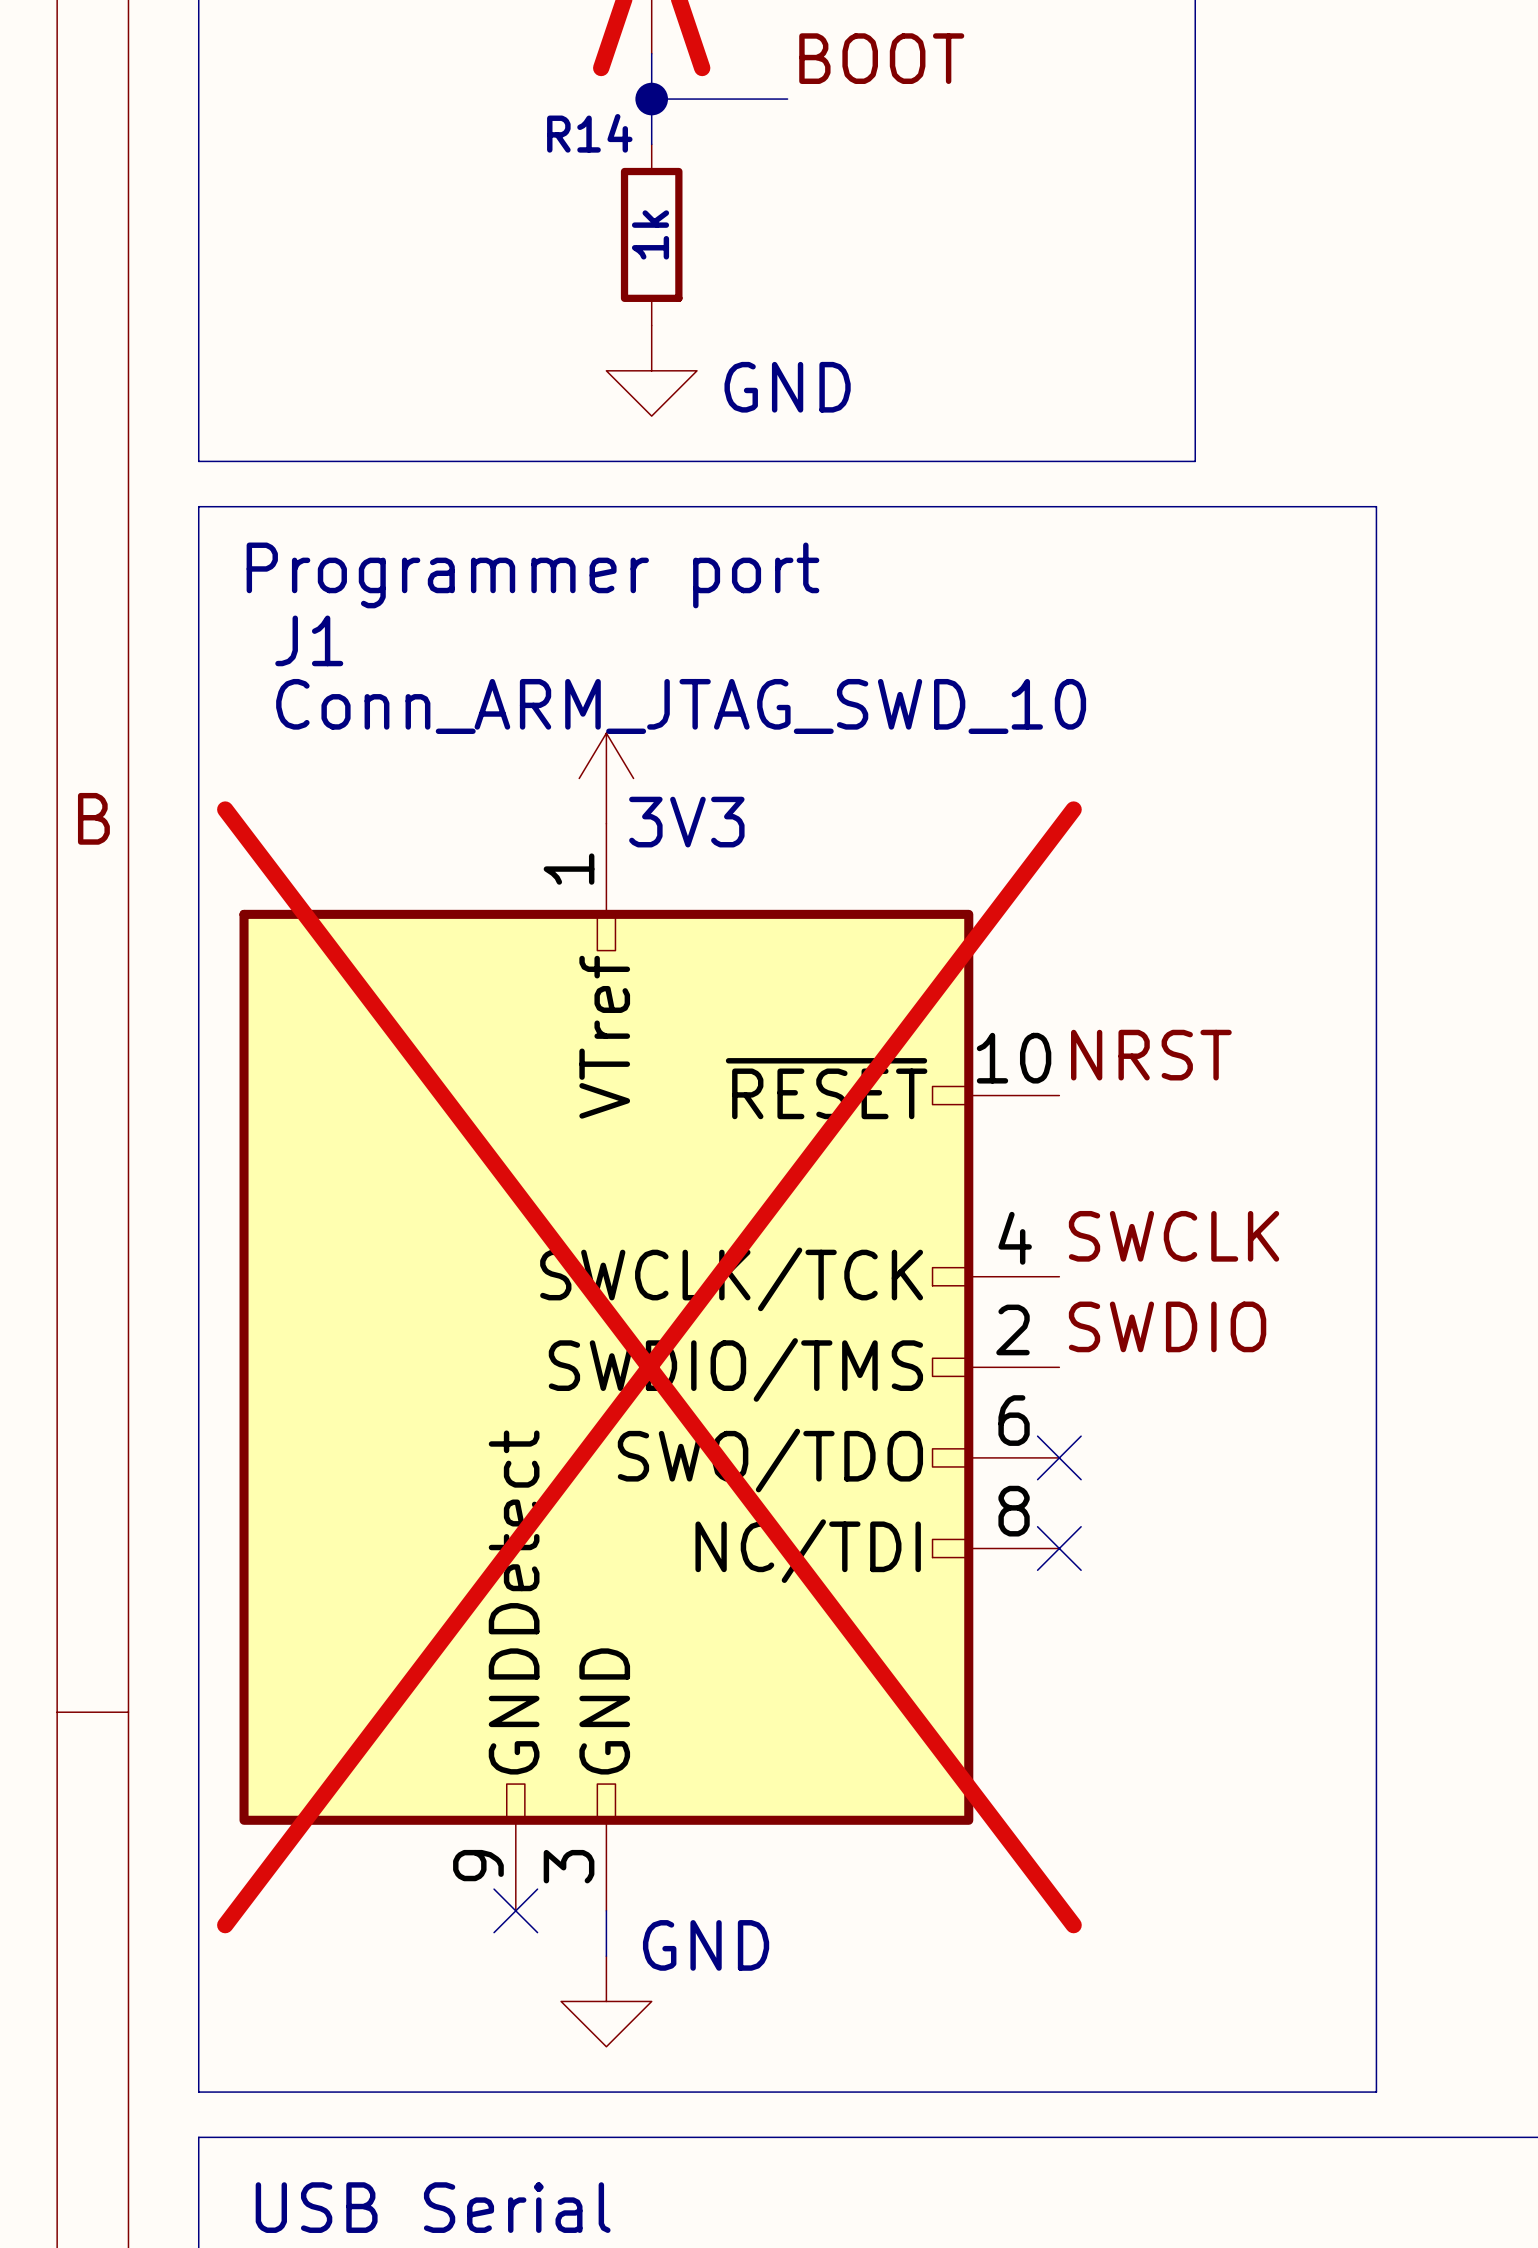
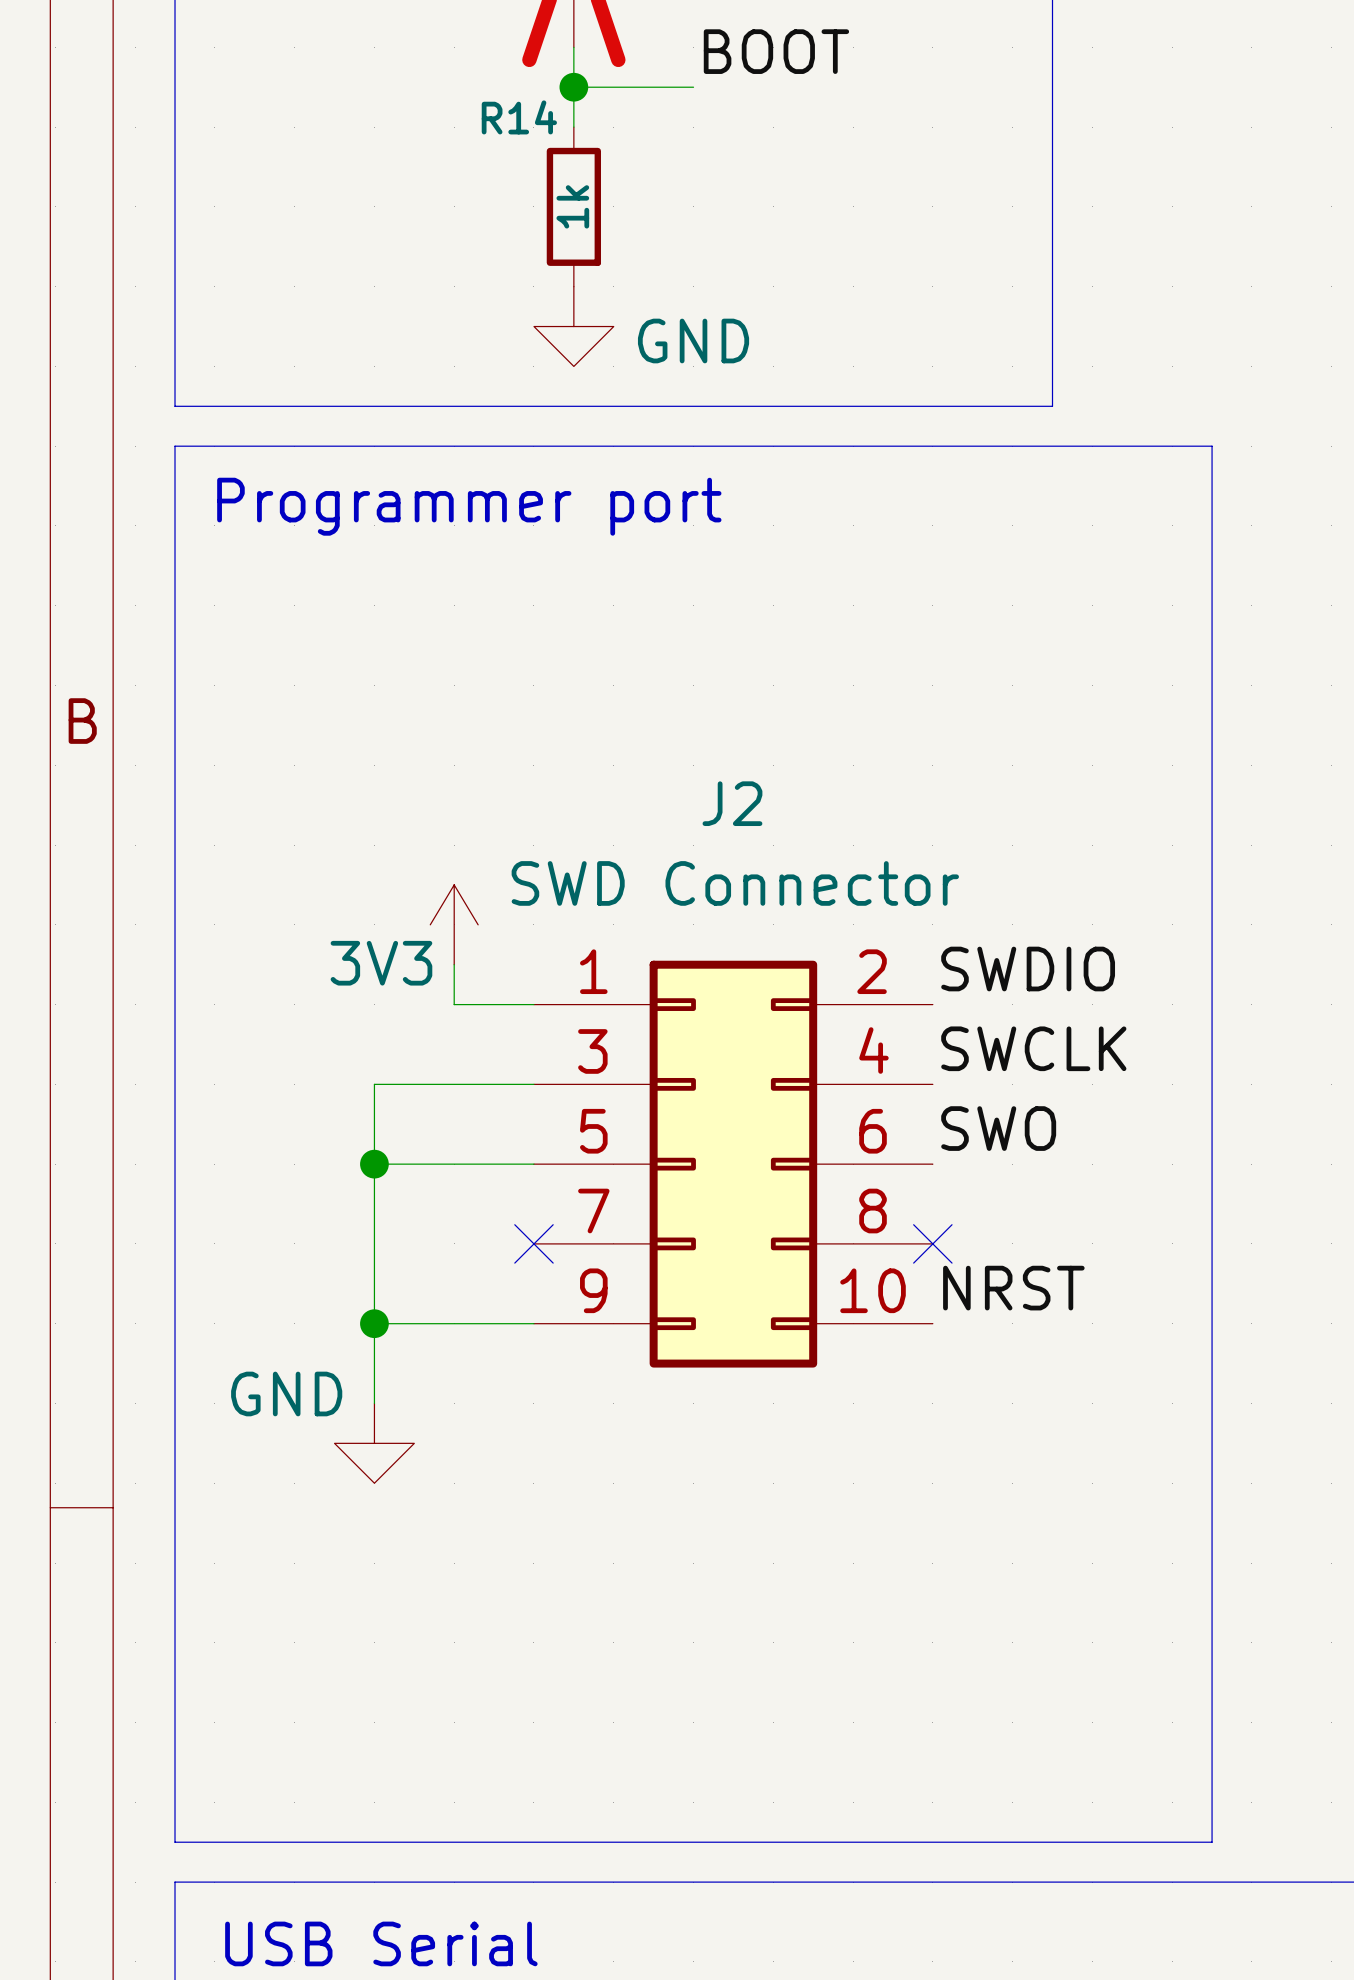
power symbol position: 3V3 (606, 778) -> 3V3 (454, 924)
power symbol text position: 3V3 (686, 822) -> 3V3 (381, 963)
label position: NRST (1151, 1055) -> NRST (1013, 1288)
label position: SWCLK (1174, 1236) -> SWCLK (1033, 1048)
label: none -> SWO (998, 1128)
junction: none -> (374, 1164)
J2: none -> SWD Connector (733, 1164)
label position: SWDIO (1167, 1326) -> SWDIO (1028, 969)
J1: Conn_ARM_JTAG_SWD_10 (649, 1367) -> none
no-connect mark: none -> (533, 1243)
no-connect mark position: (1059, 1457) -> (932, 1243)
junction: none -> (374, 1323)
no-connect mark: (1059, 1548) -> none
no-connect mark: (515, 1910) -> none
wire: (606, 1910) (606, 1956) -> none
power symbol text position: GND (706, 1945) -> GND (286, 1393)
power symbol position: GND (606, 2001) -> GND (374, 1443)

